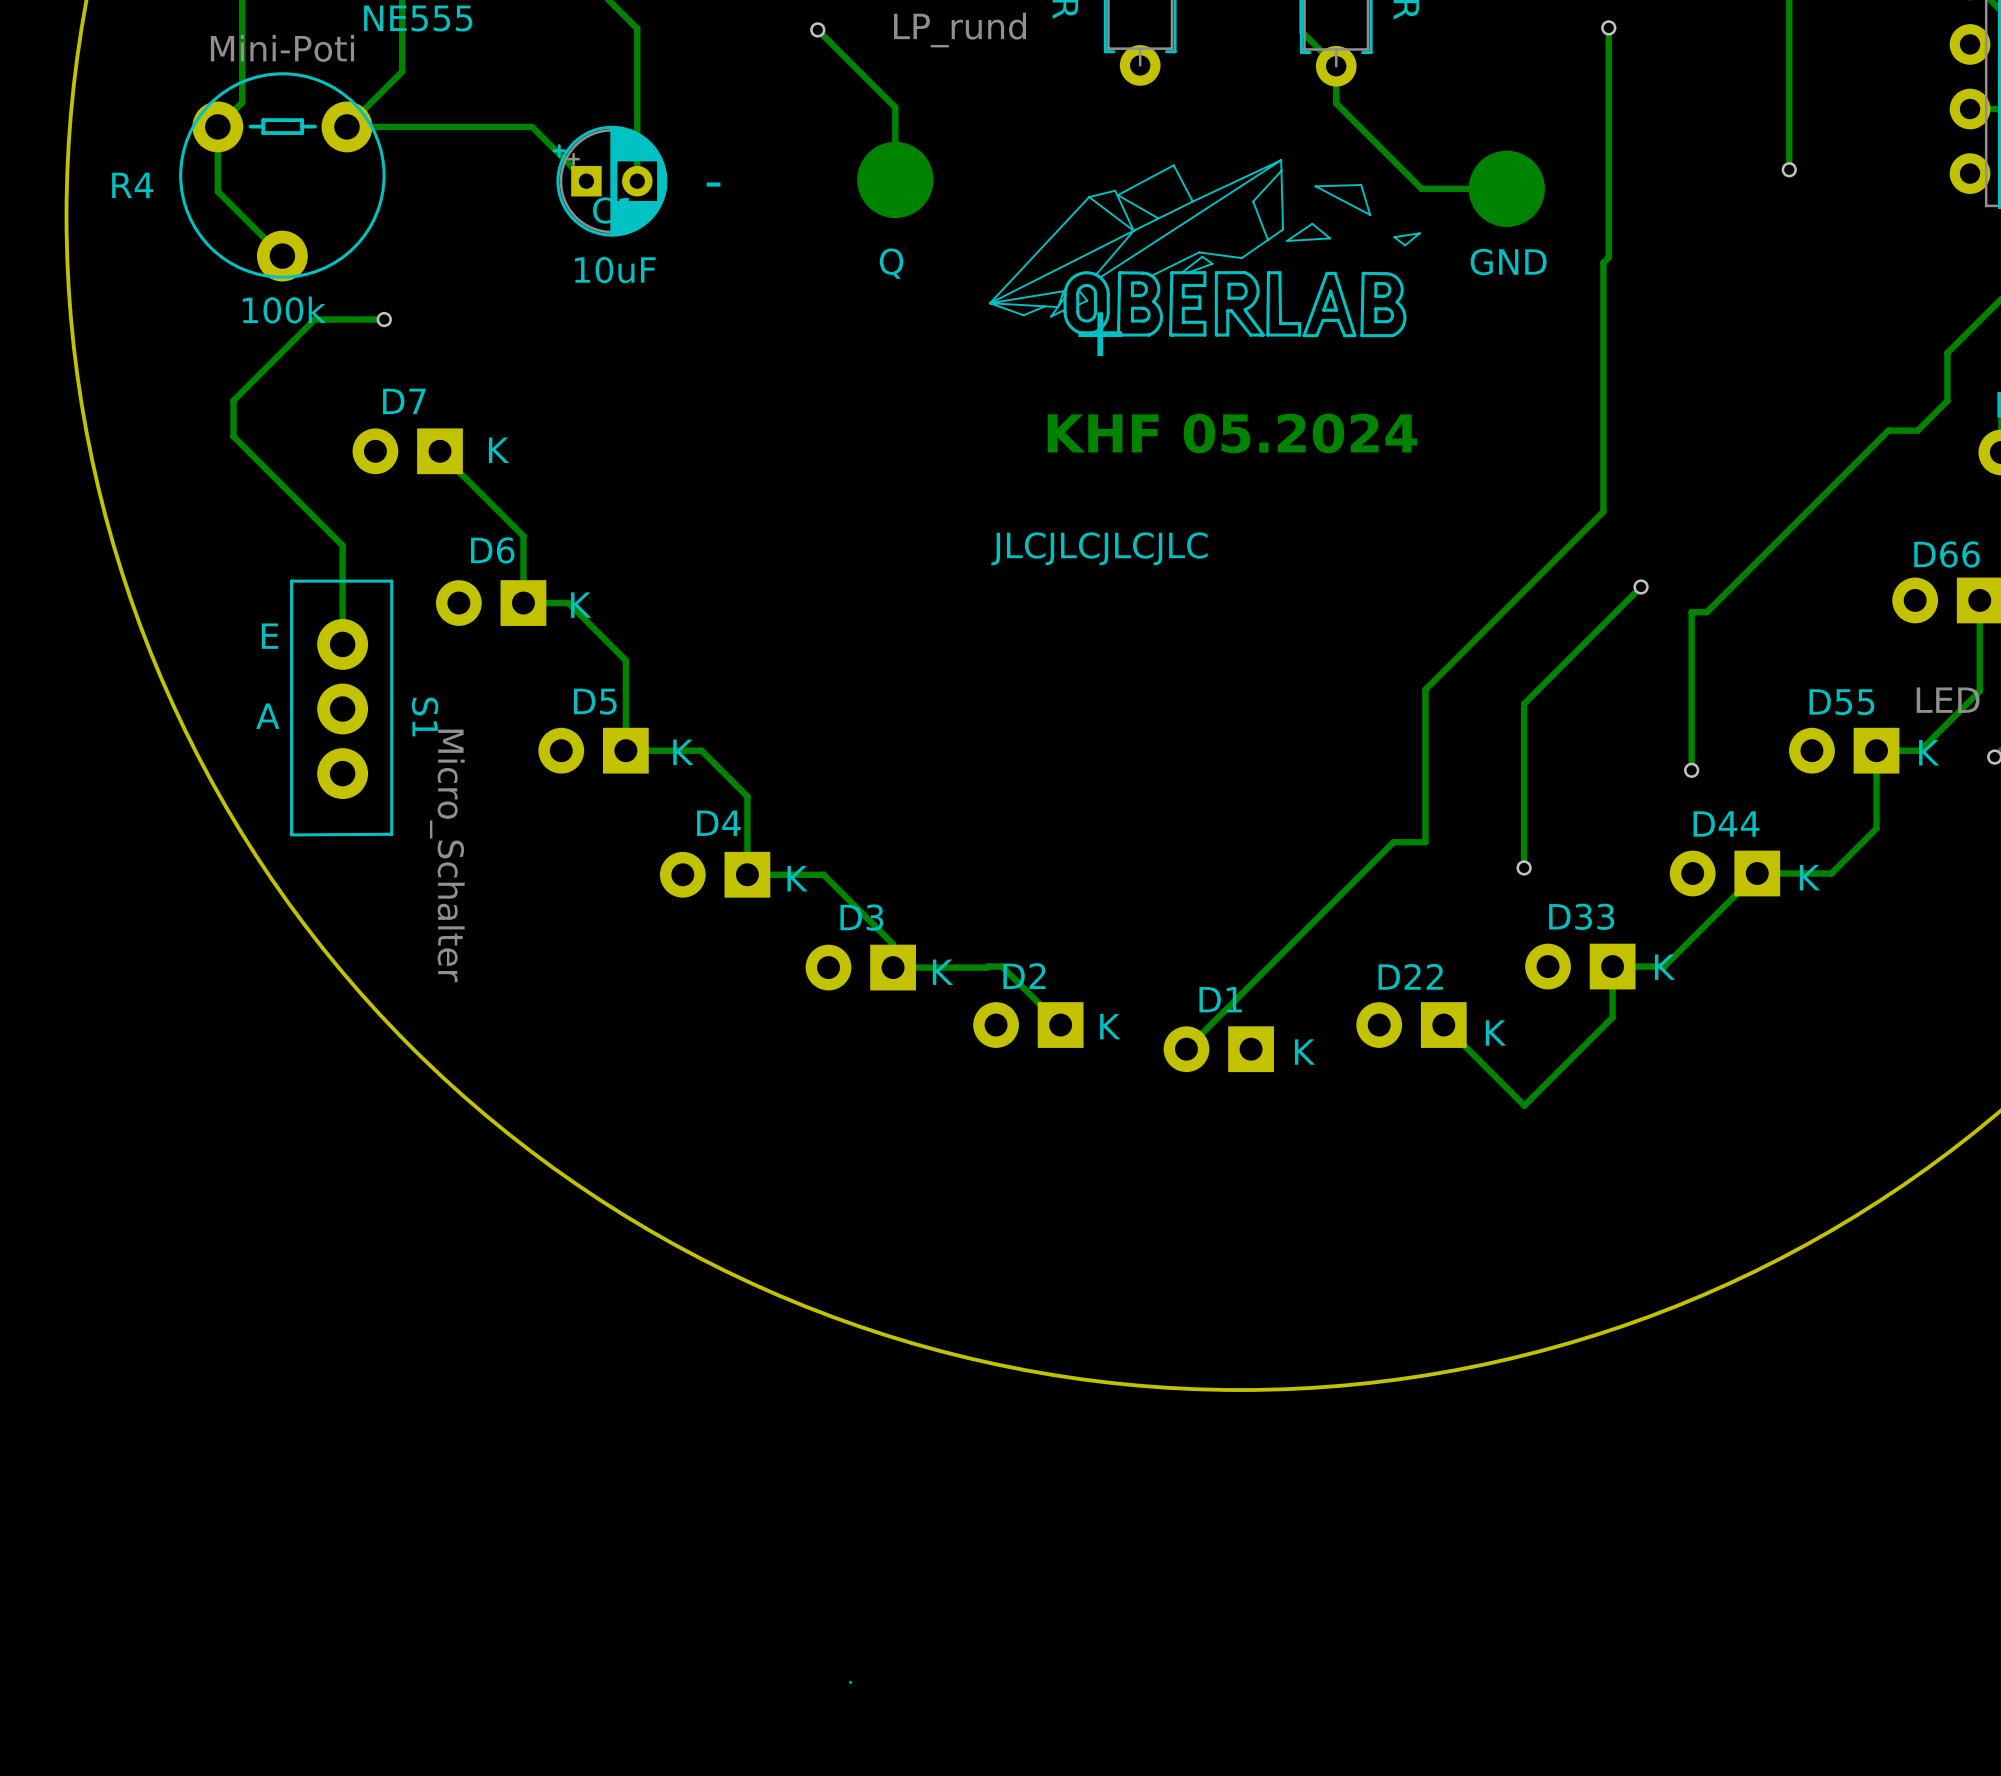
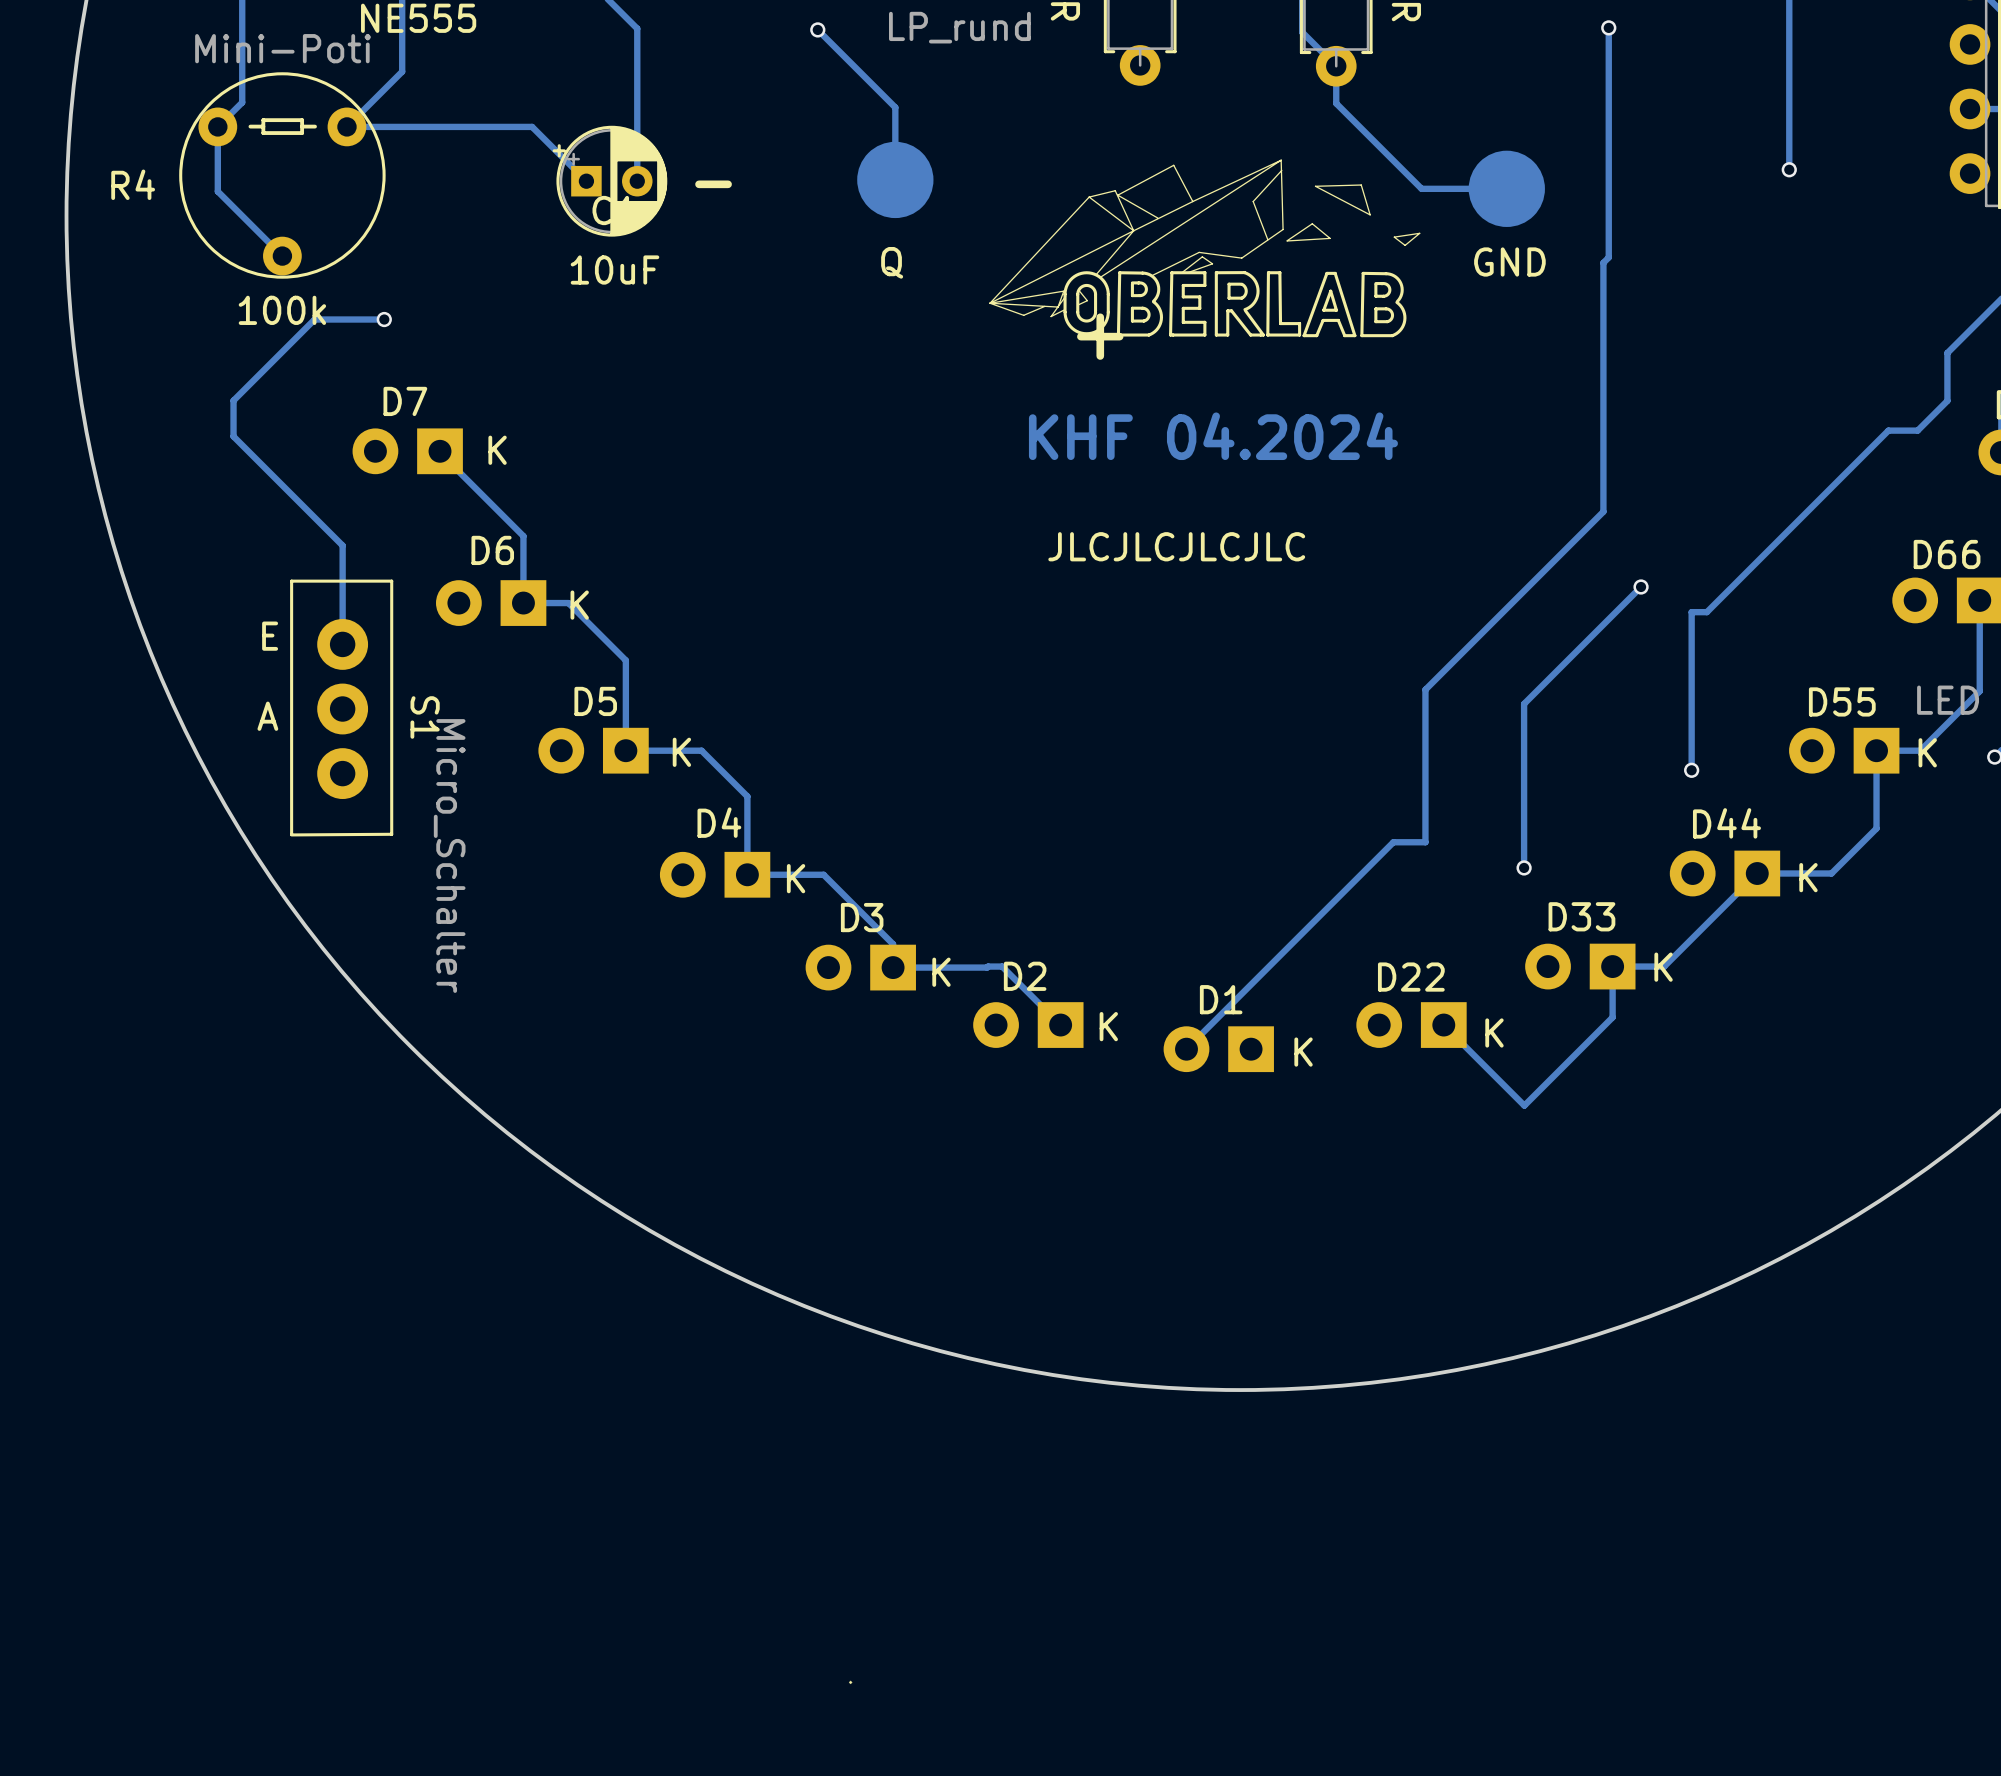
part footprint: [179, 72, 386, 282] -> [179, 72, 386, 279]
text: KHF 05.2024 (1232, 433) -> KHF 04.2024 (1213, 436)
text position: JLCJLCJLCJLC (1099, 548) -> JLCJLCJLCJLC (1176, 546)

